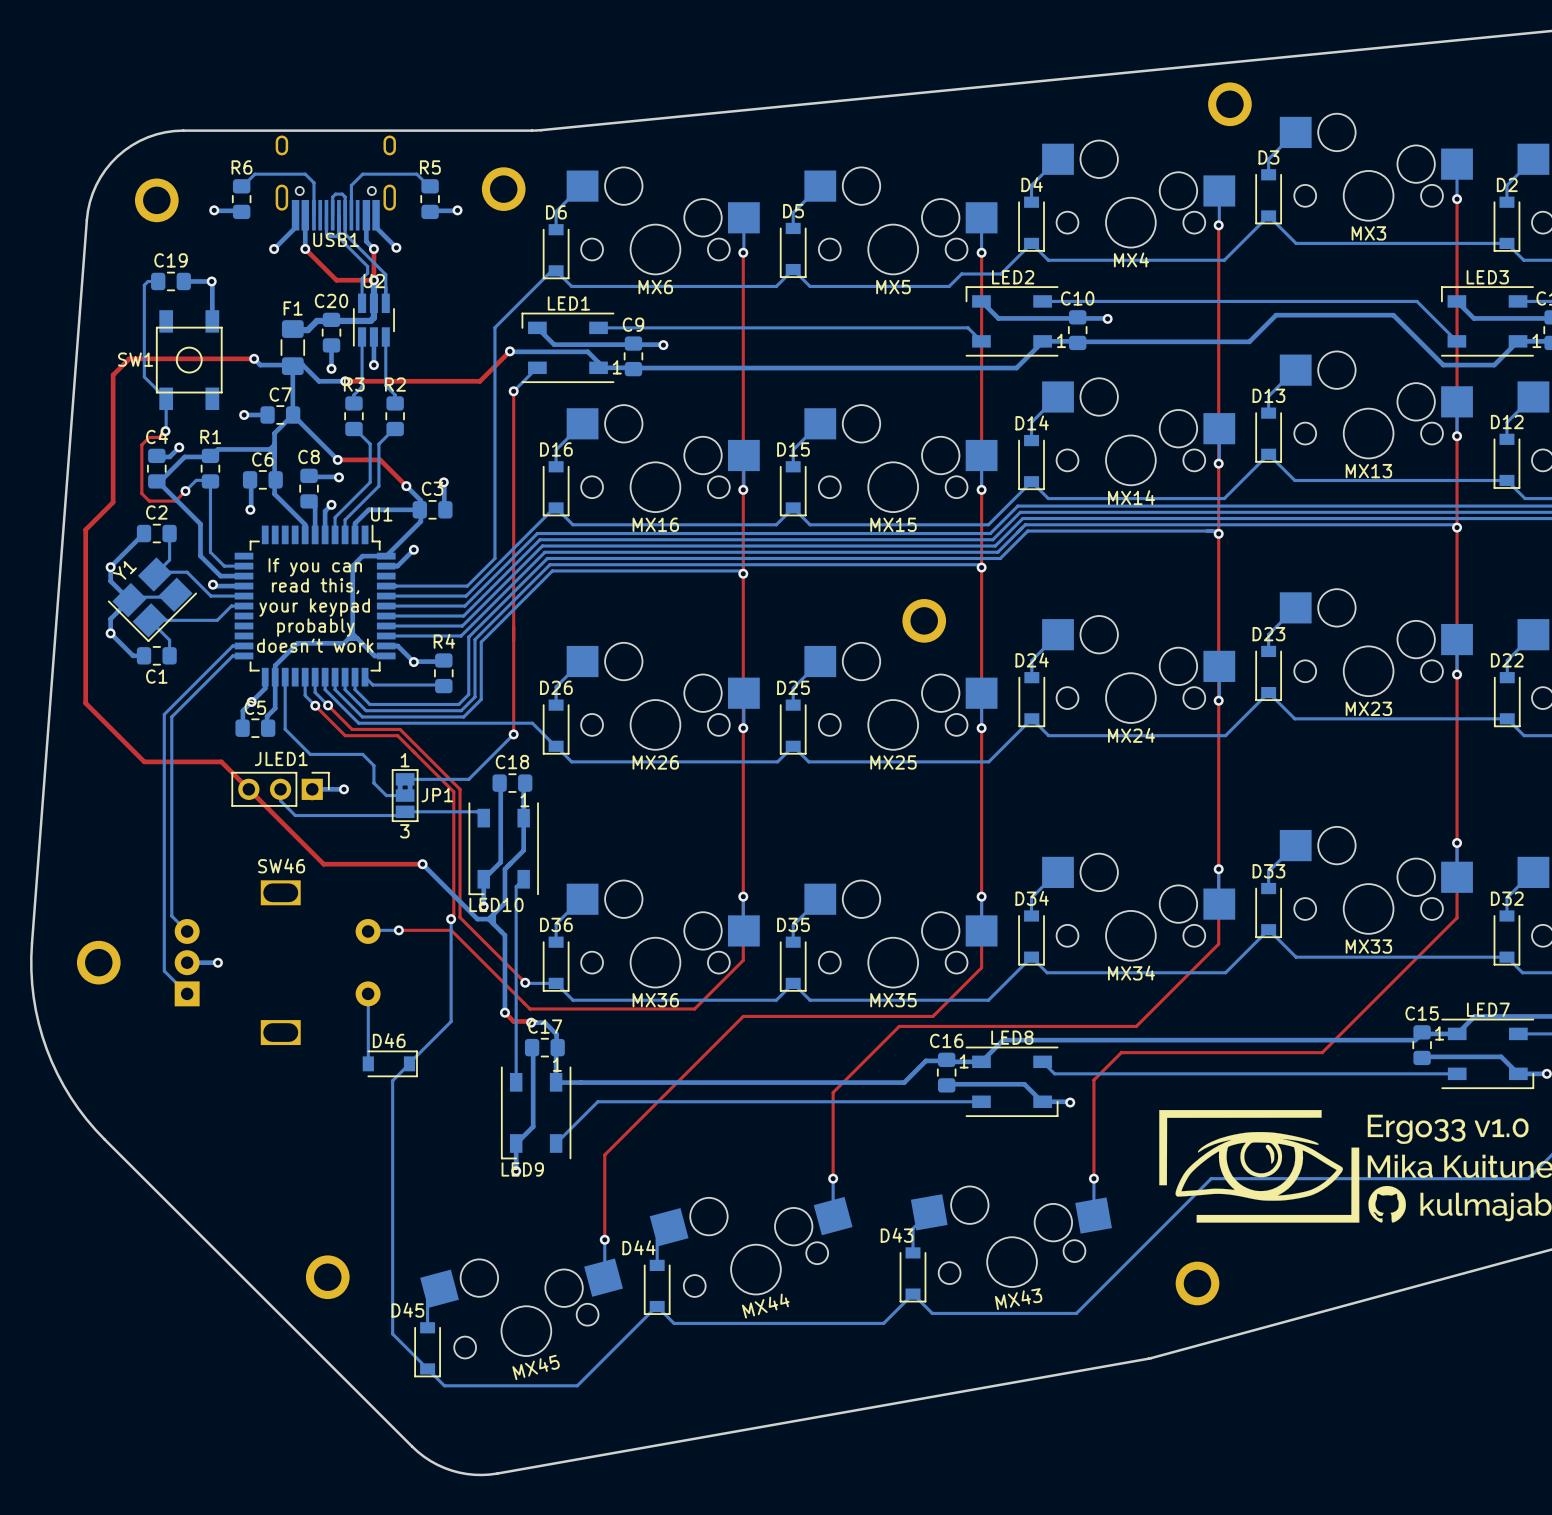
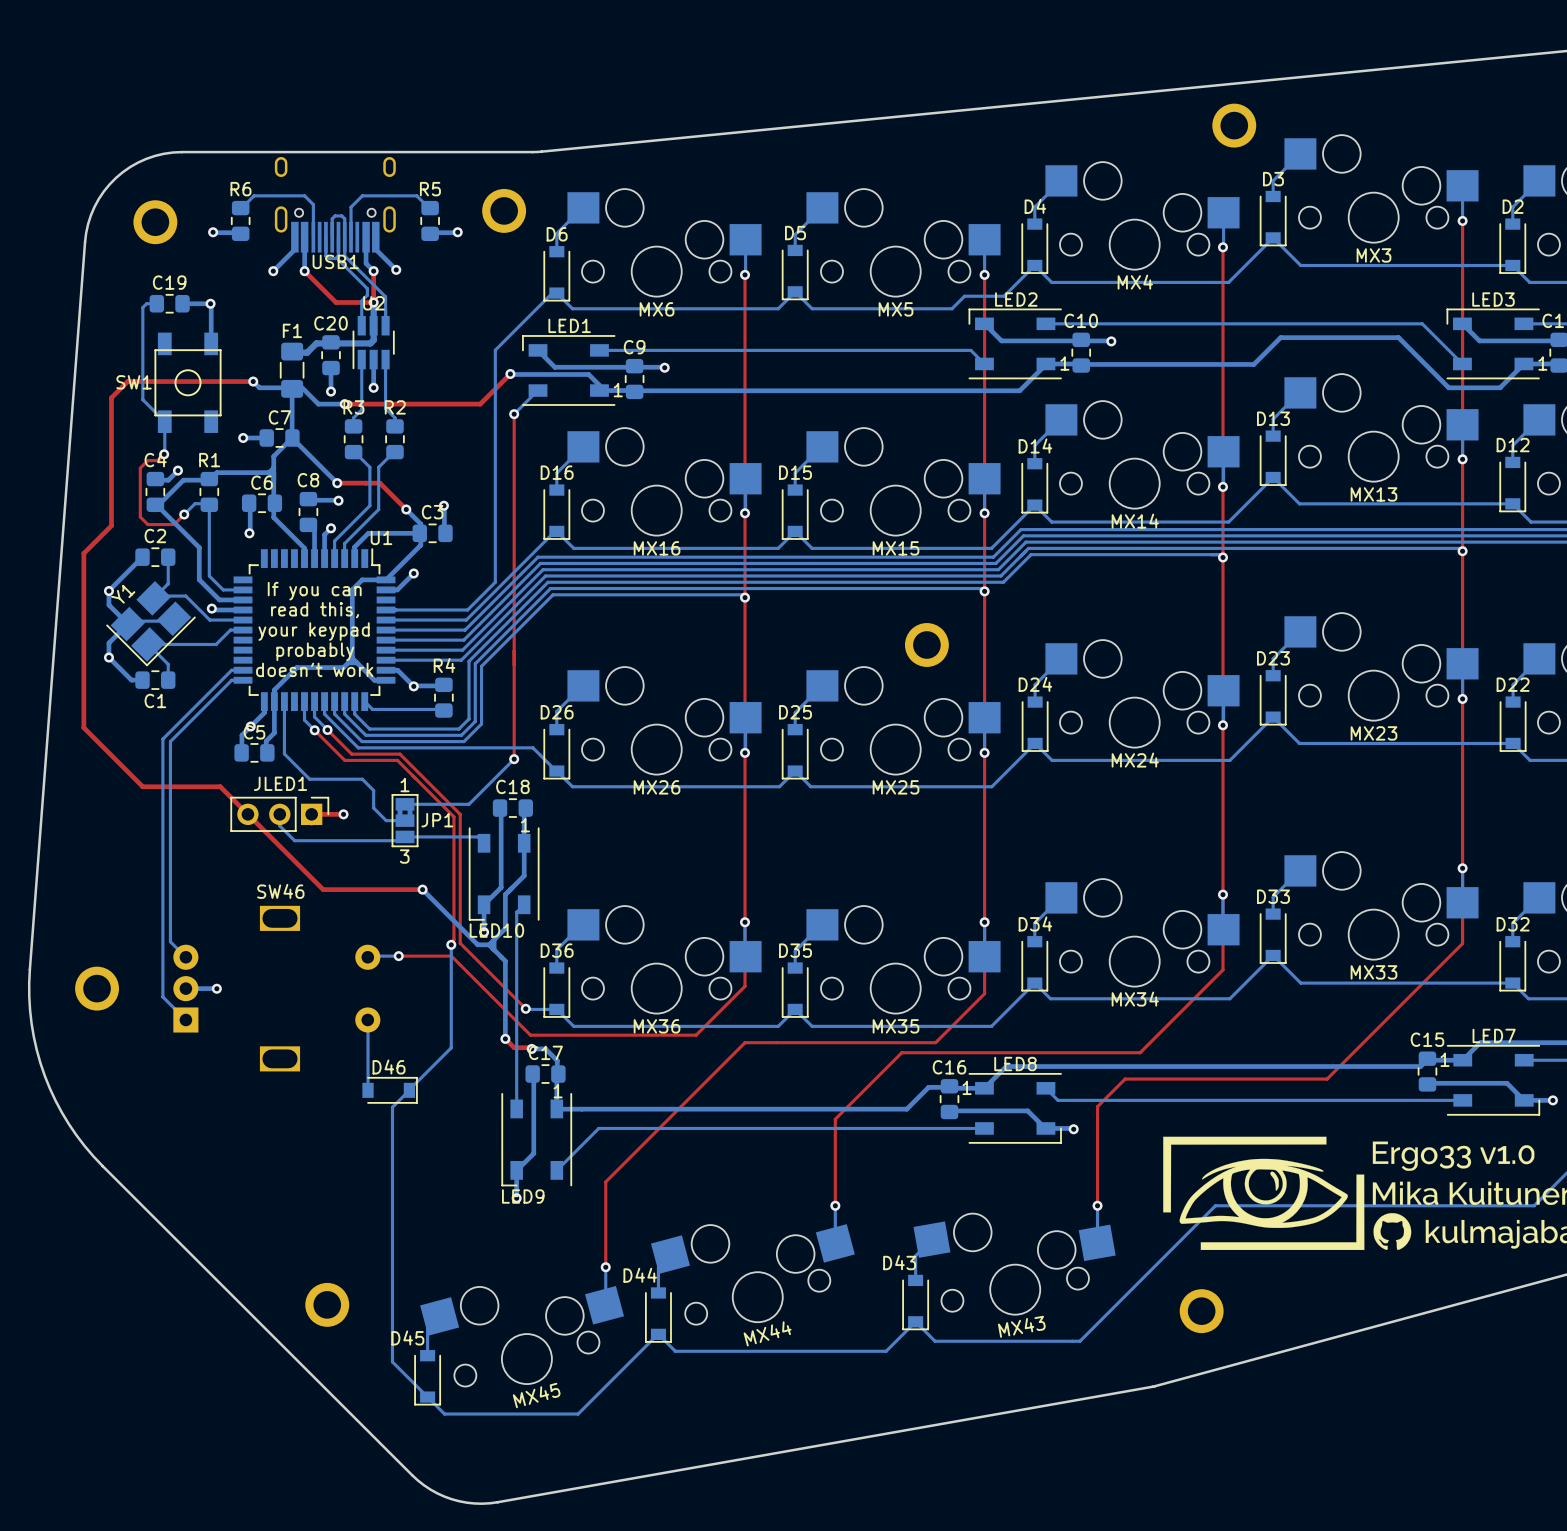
bottom track: (343, 789) (312, 789) -> none
top track: none -> (343, 814) (311, 814)

